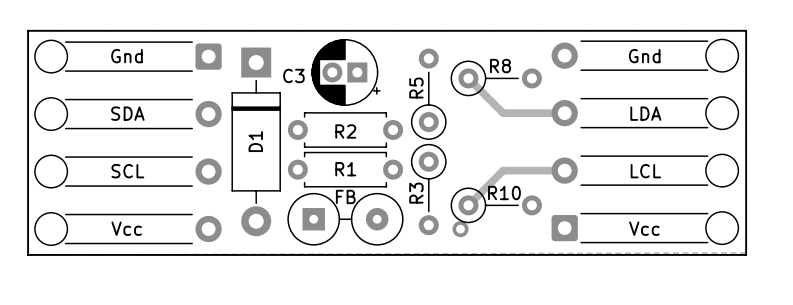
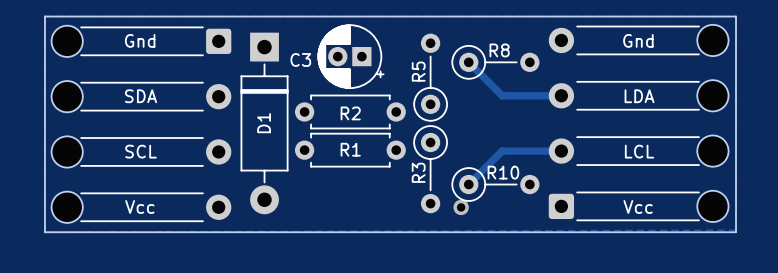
FB: (345, 219) -> none

